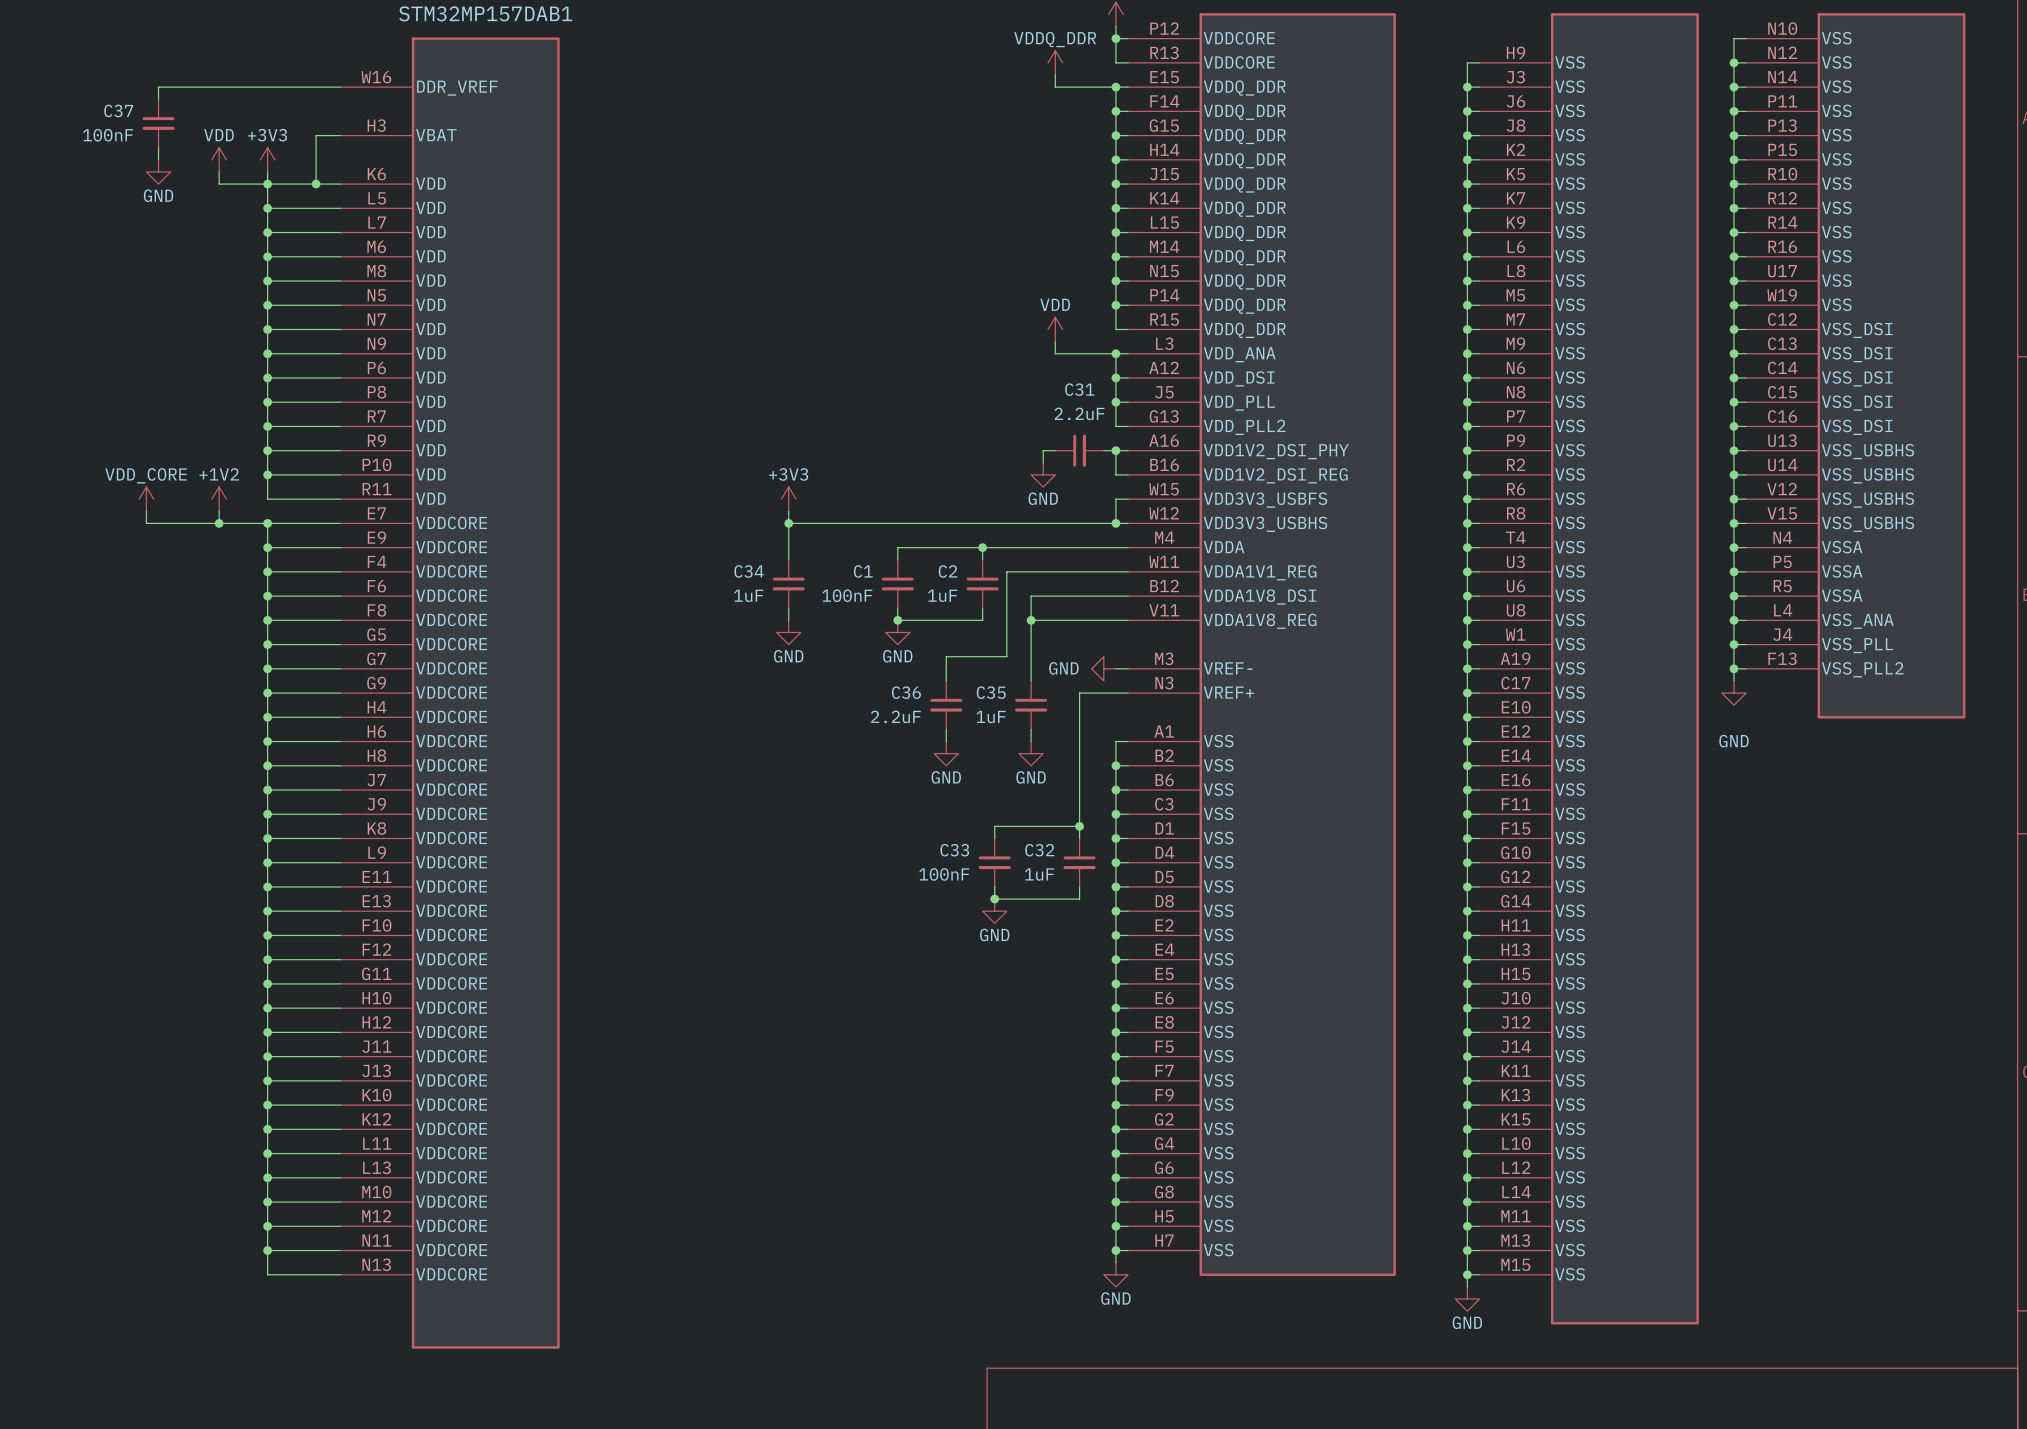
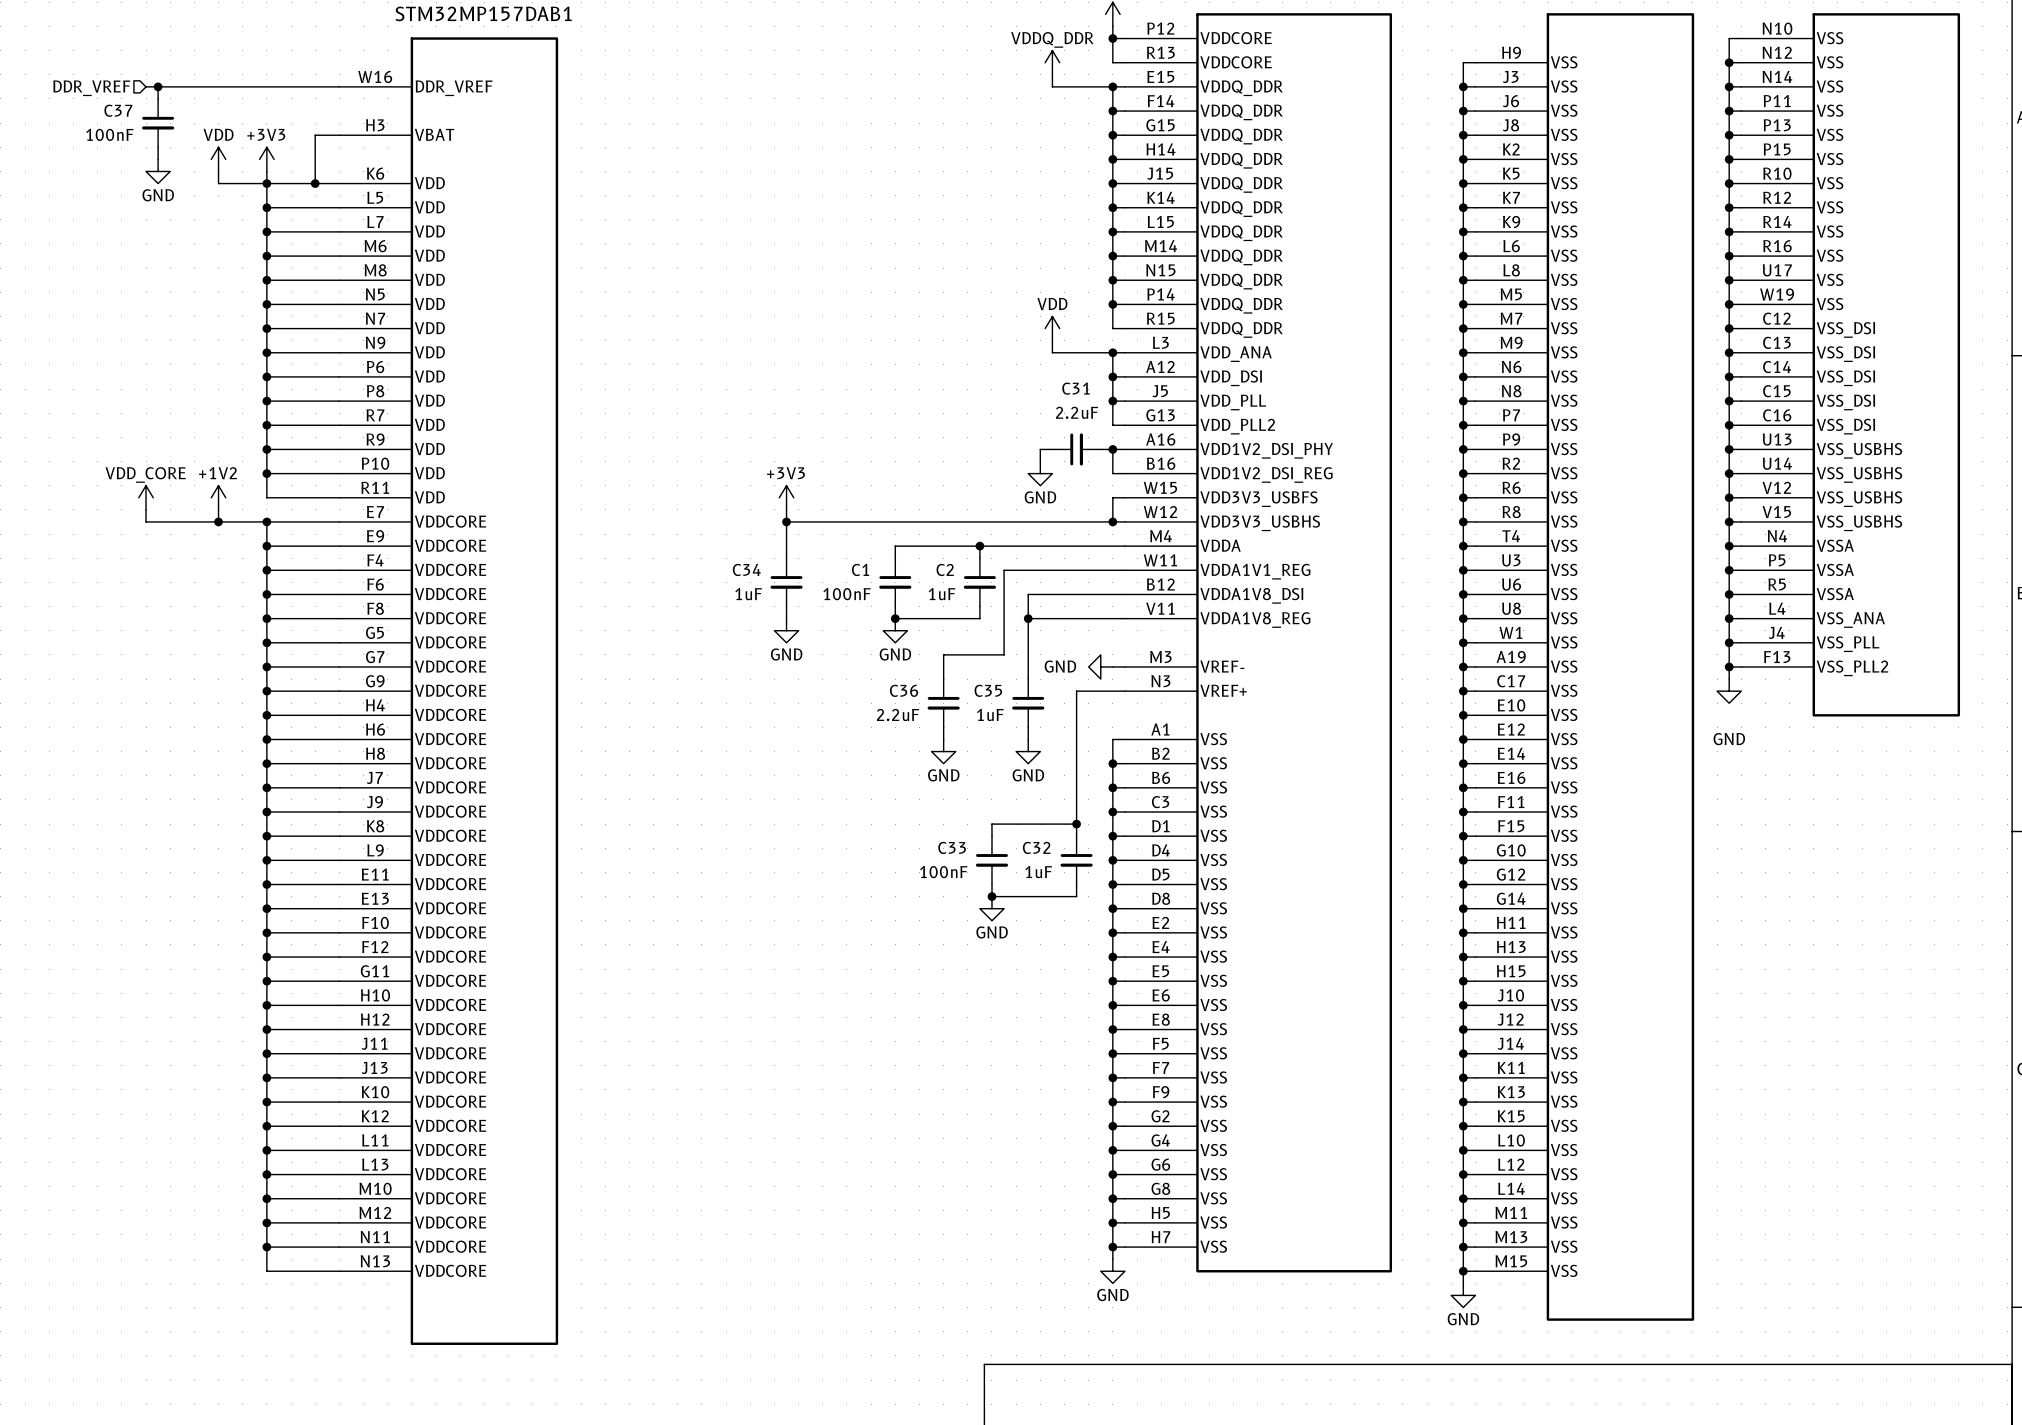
wire: none -> (146, 86) (158, 86)
junction: none -> (158, 86)
hierarchical label: none -> DDR_VREF (91, 88)

